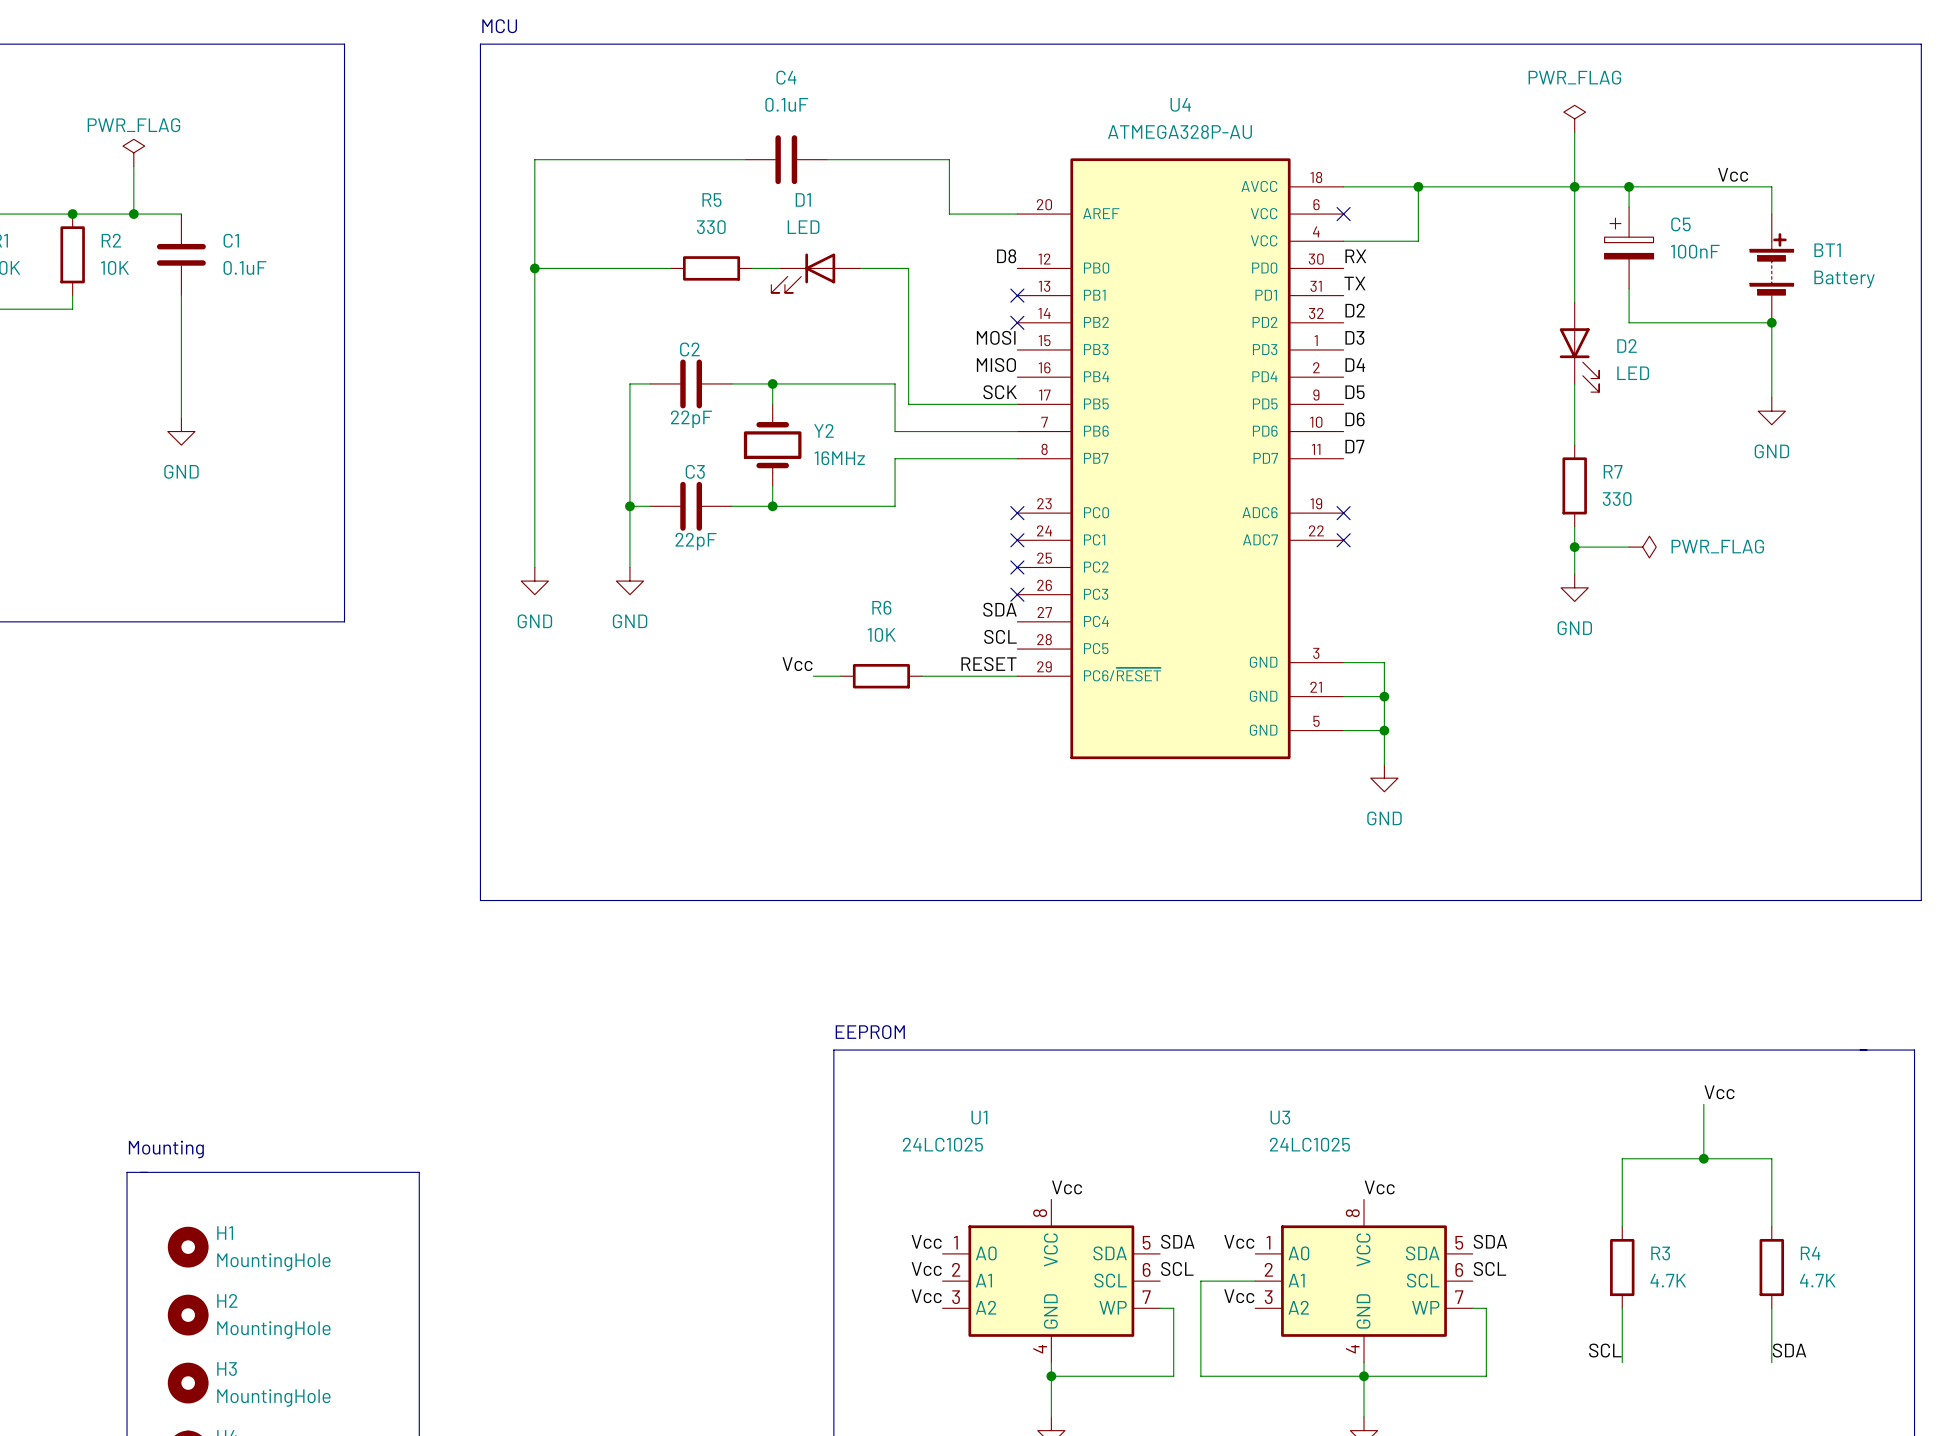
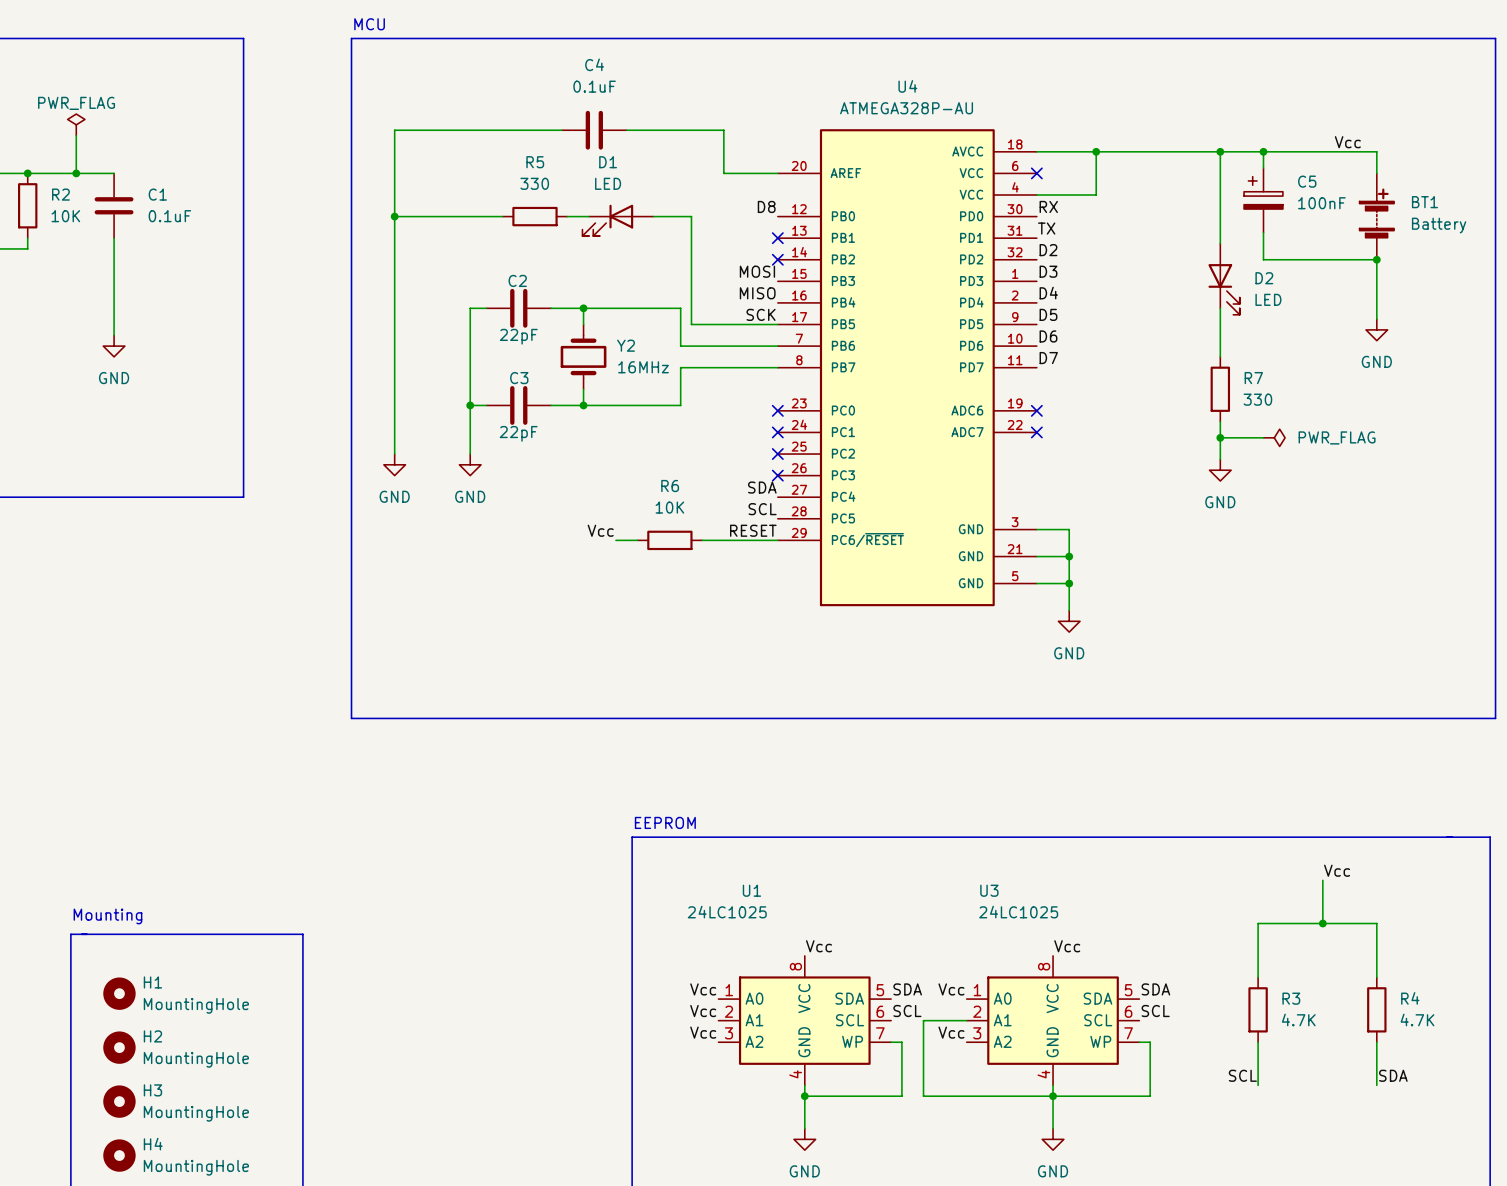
power symbol: PWR_FLAG (1574, 118) -> none
wire: (1574, 132) (1574, 186) -> none

